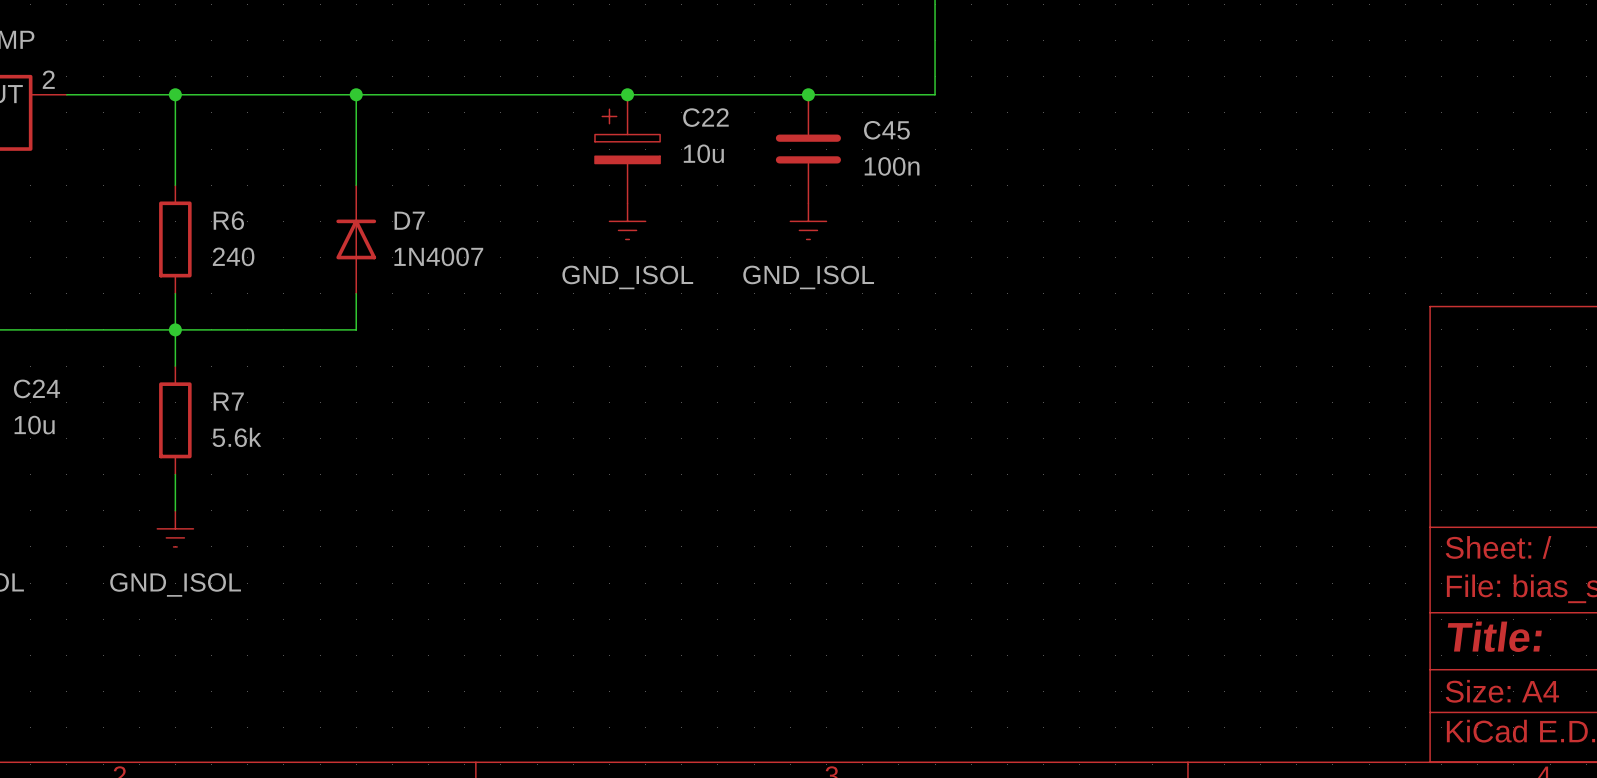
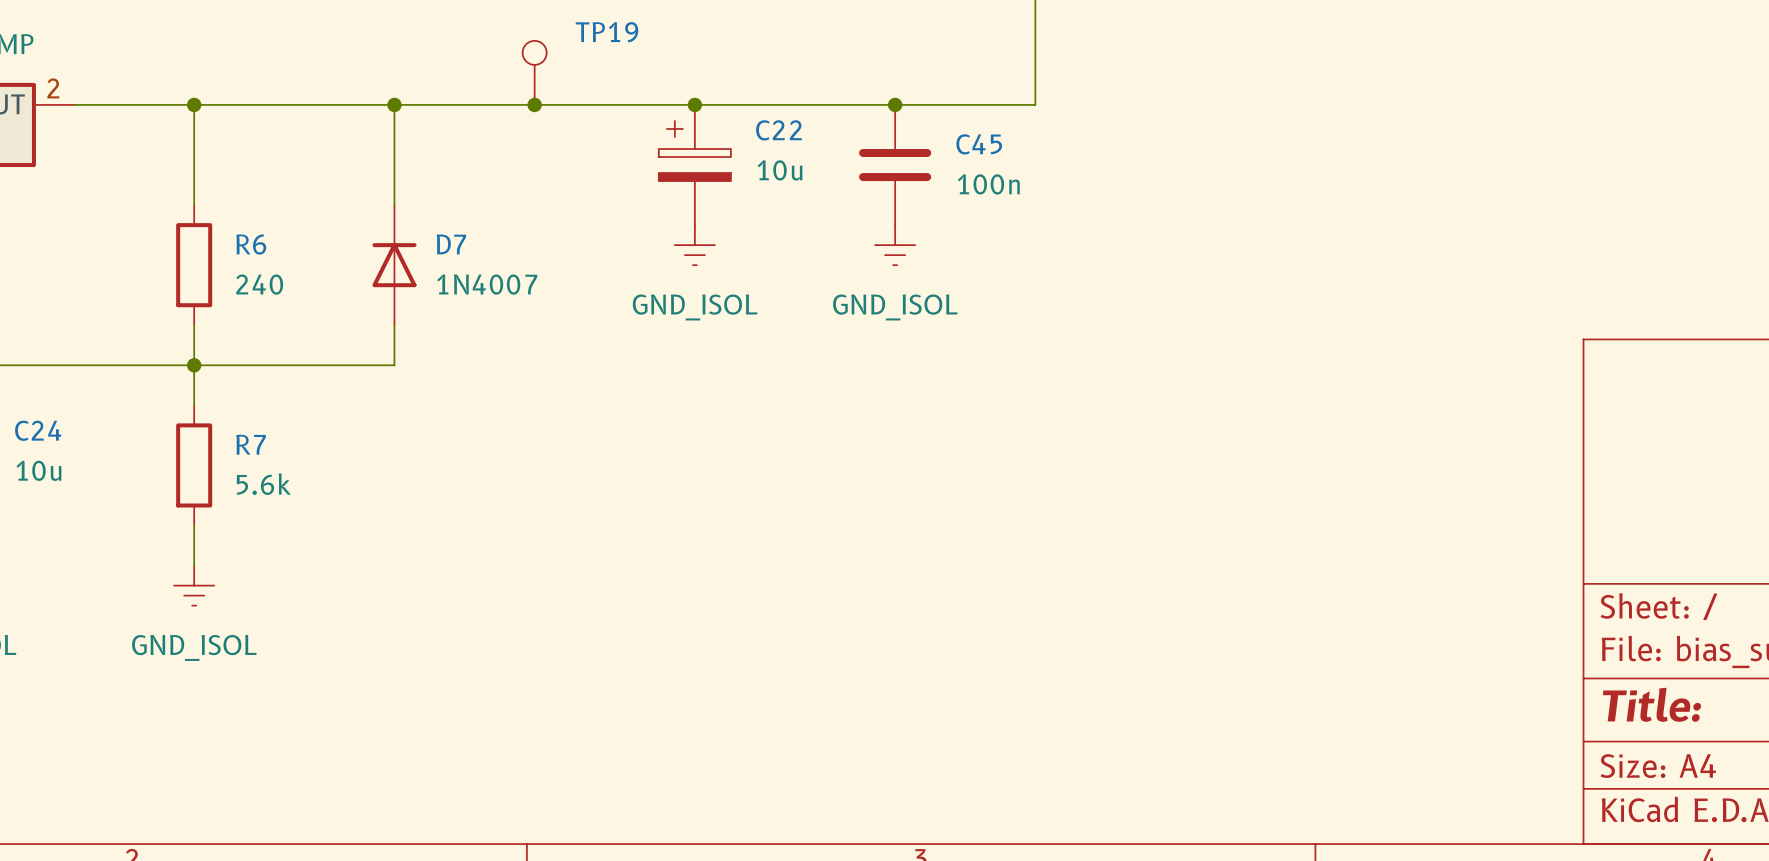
TP19: none -> (534, 72)
junction: none -> (534, 104)

